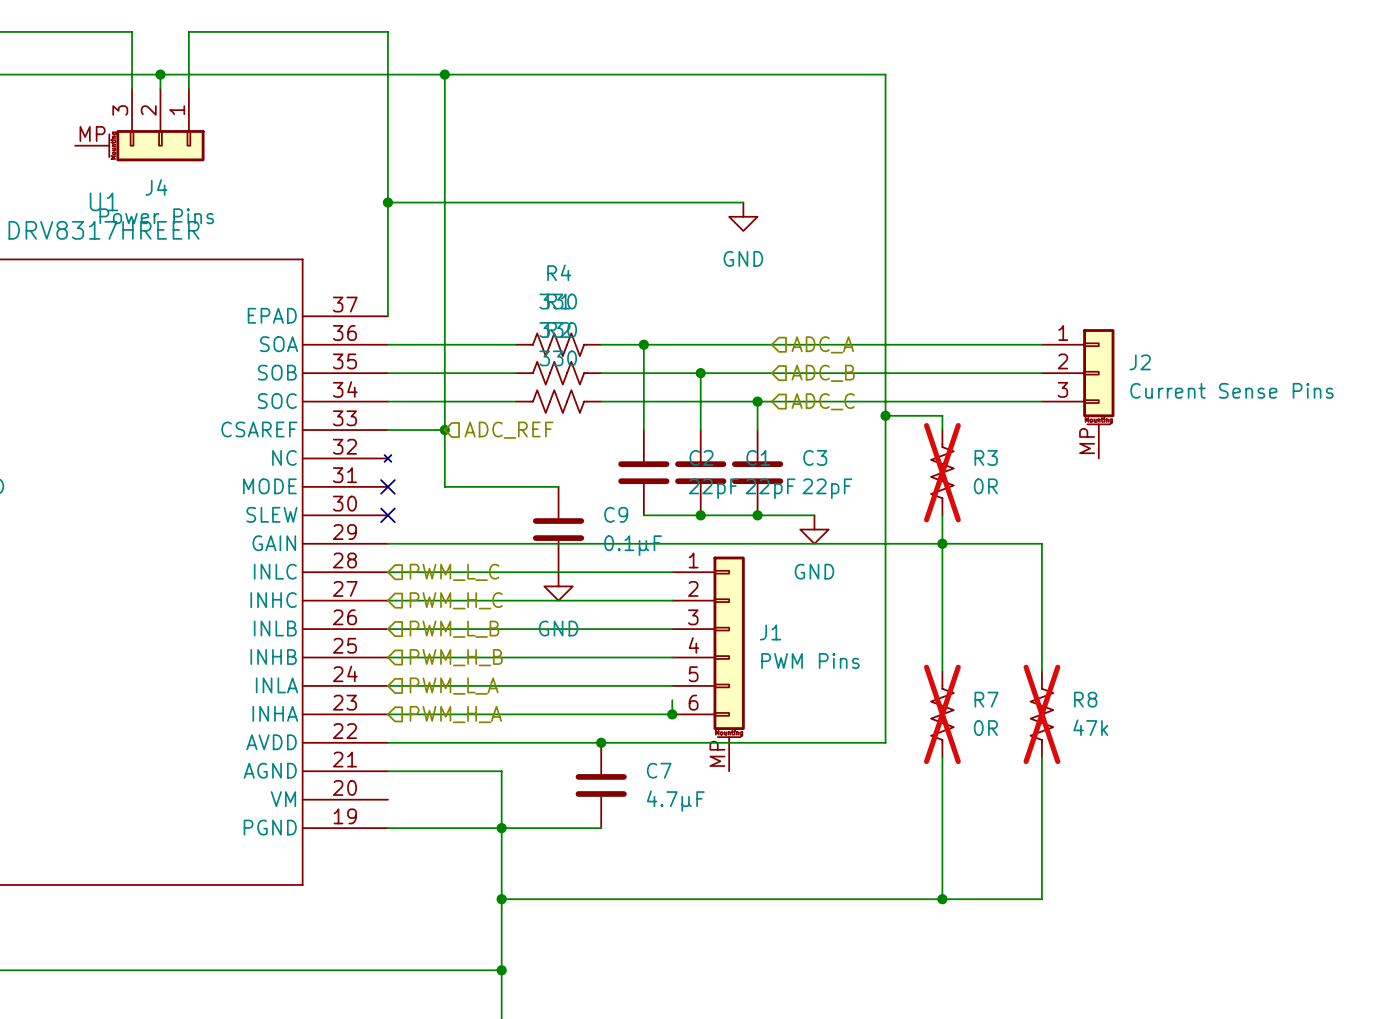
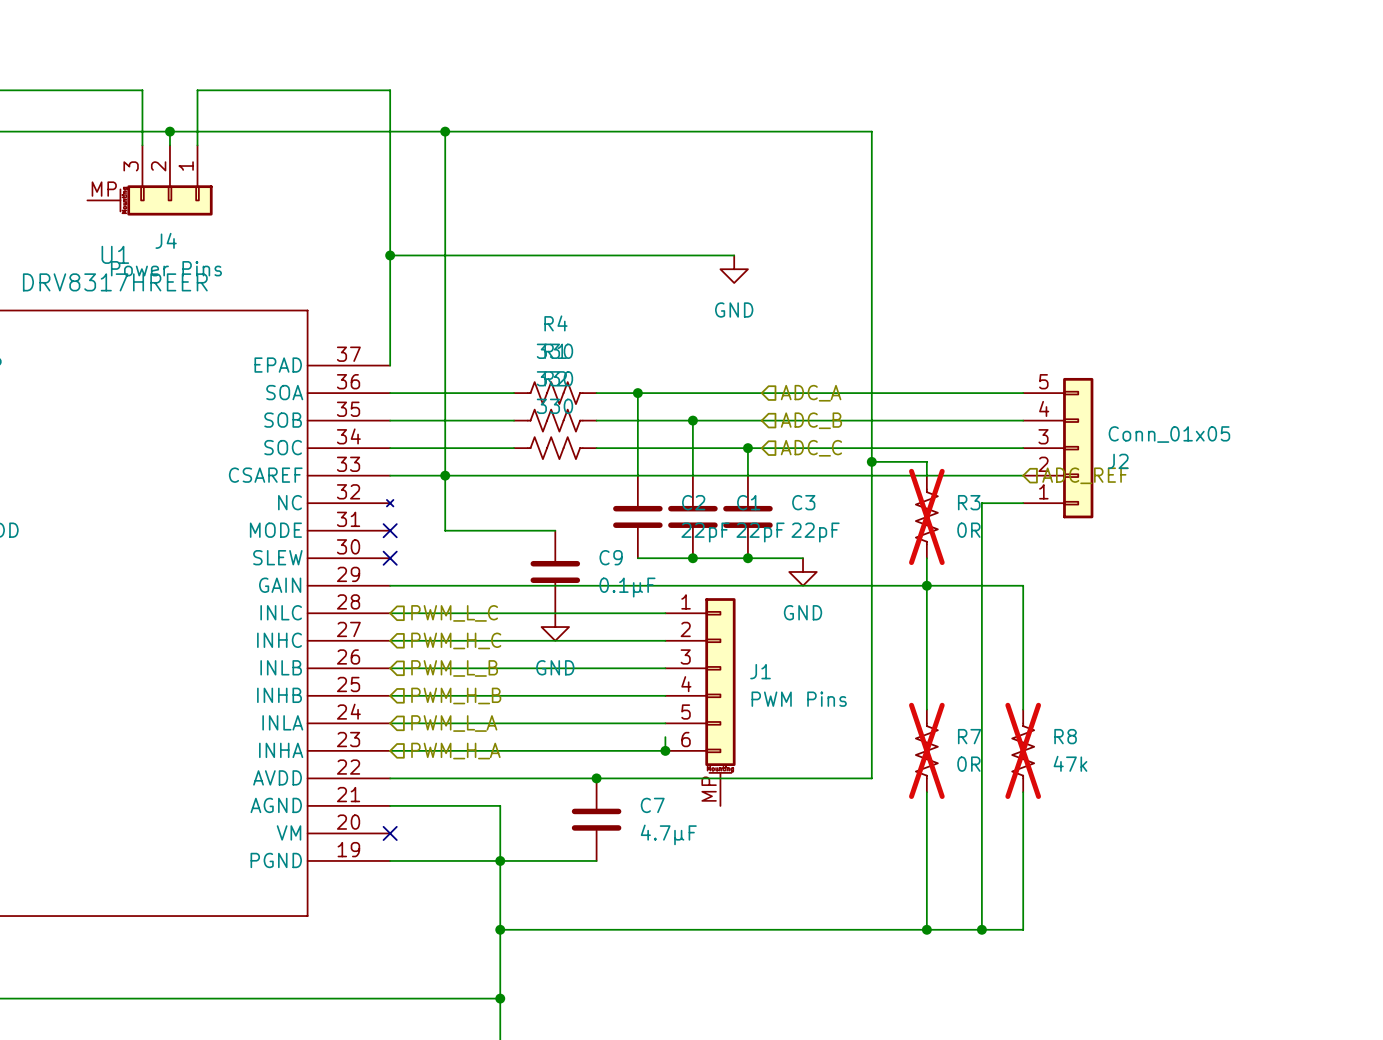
J2 symbol: [1041, 329, 1115, 459] -> [1023, 377, 1094, 519]
J2 name position: J2 (1140, 362) -> J2 (1118, 461)
J2 value: Current Sense Pins (1231, 390) -> Conn_01x05 (1169, 434)
wire: none -> (445, 475) (1023, 475)
hierarchical label: ADC_REF (509, 430) -> none
hierarchical label: none -> ADC_REF (1085, 475)
wire: none -> (1023, 503) (981, 503) (981, 929)
no-connect mark: none -> (390, 833)
junction: none -> (981, 929)

